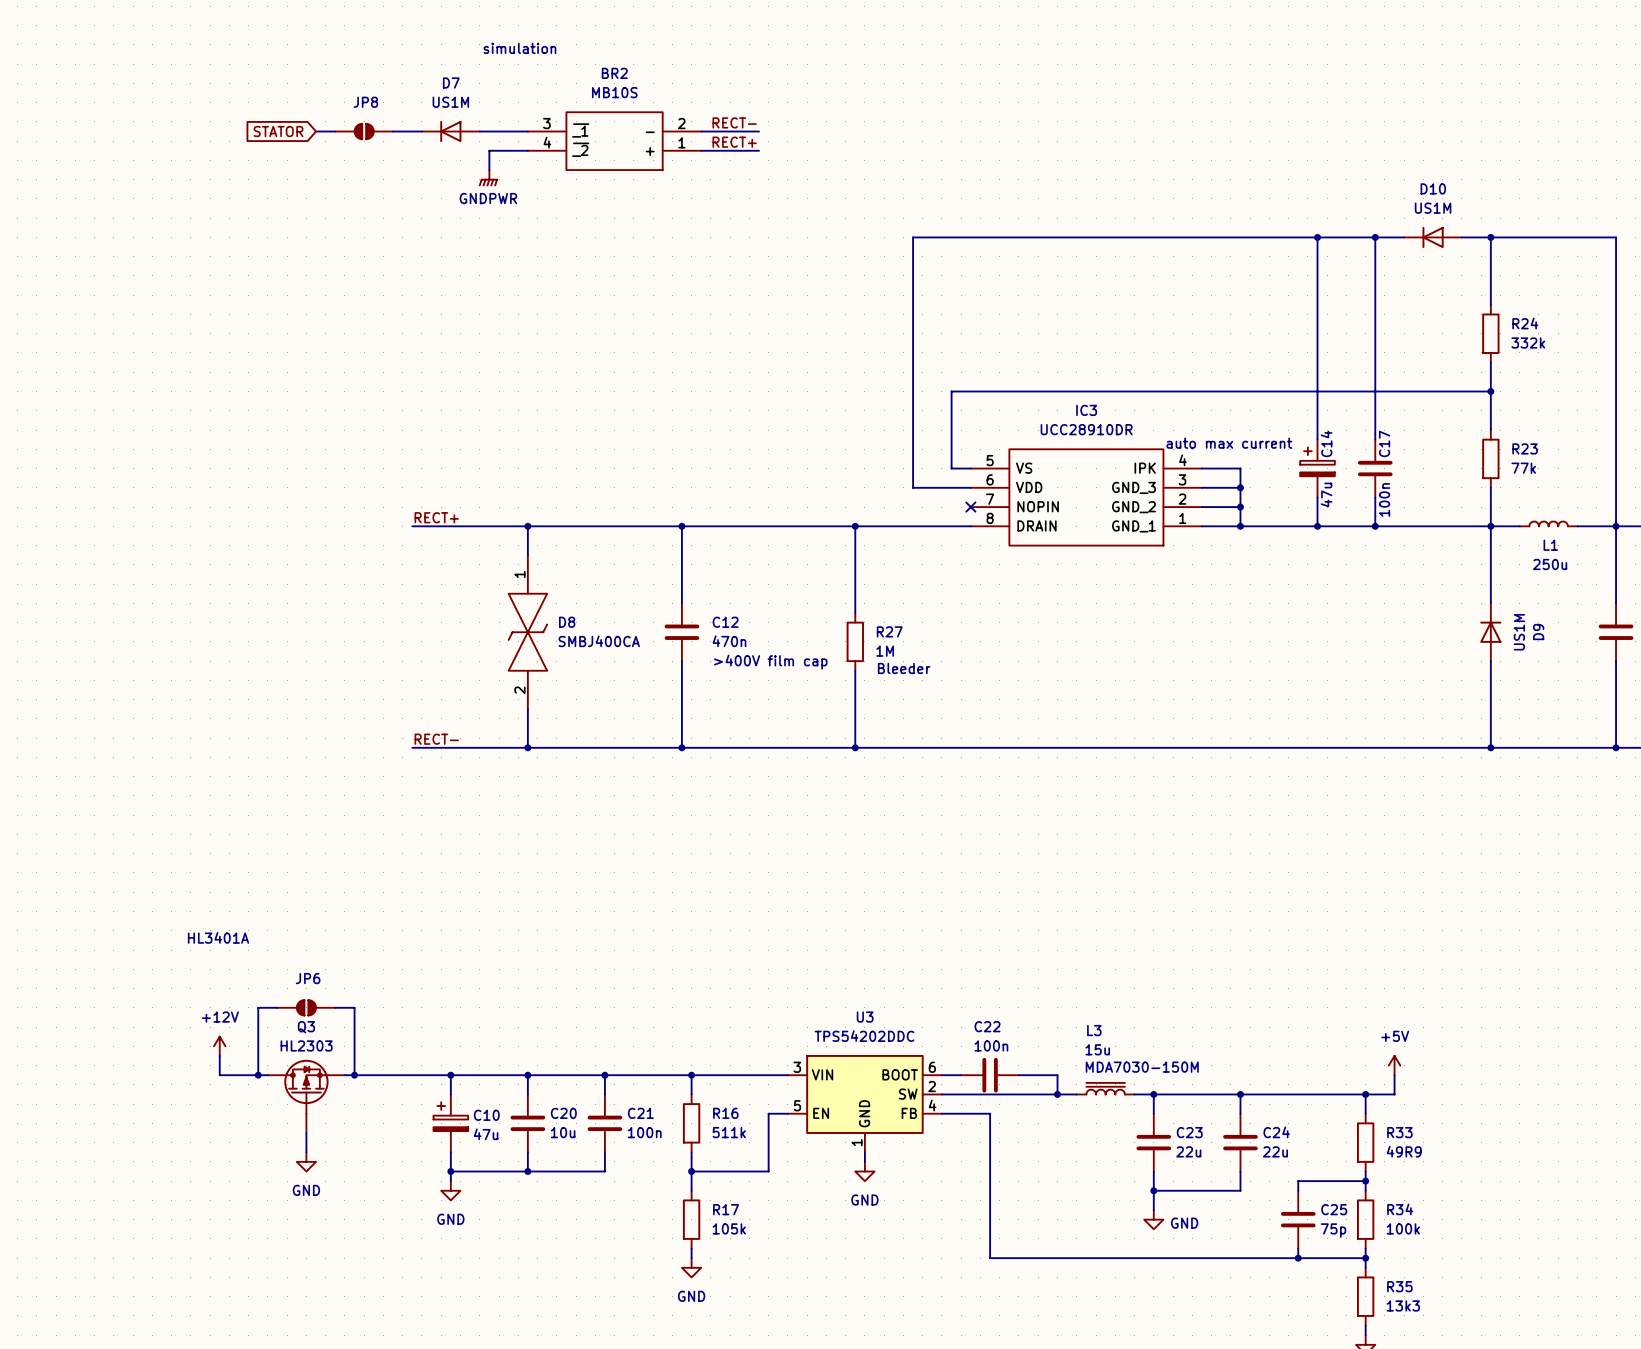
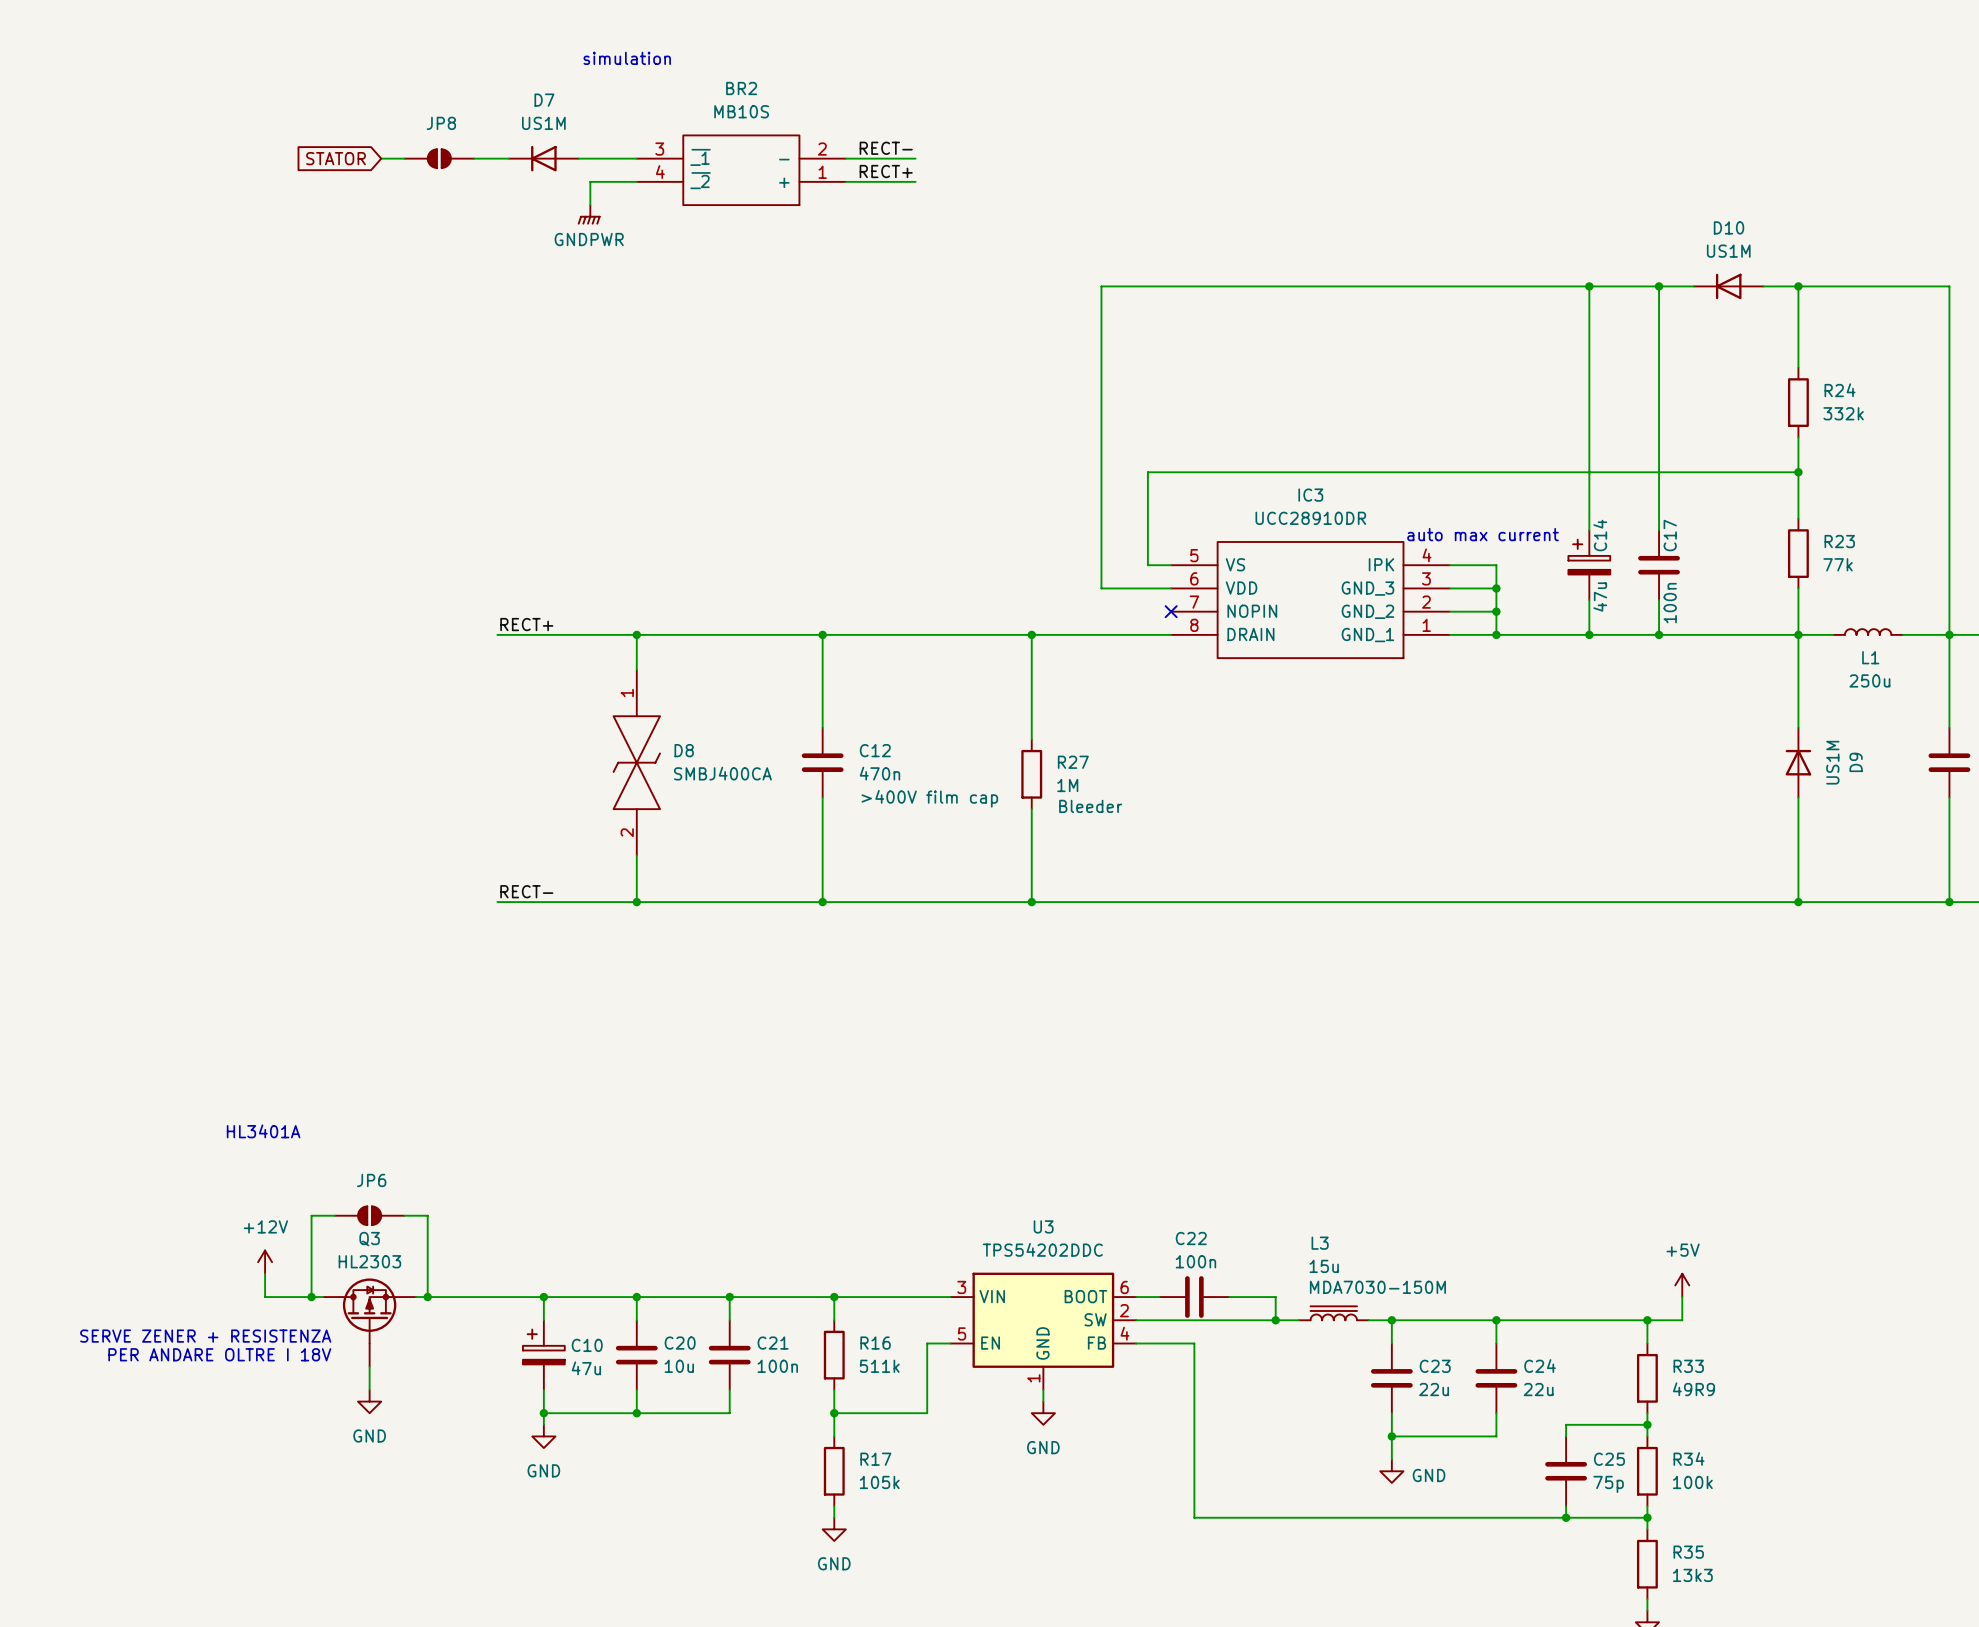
text: none -> SERVE ZENER + RESISTENZA (205, 1336)
text: none -> PER ANDARE OLTRE I 18V (219, 1354)

